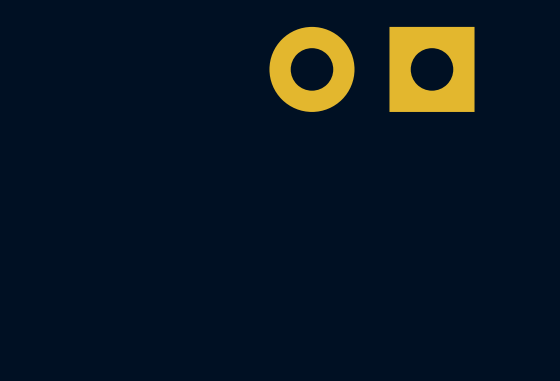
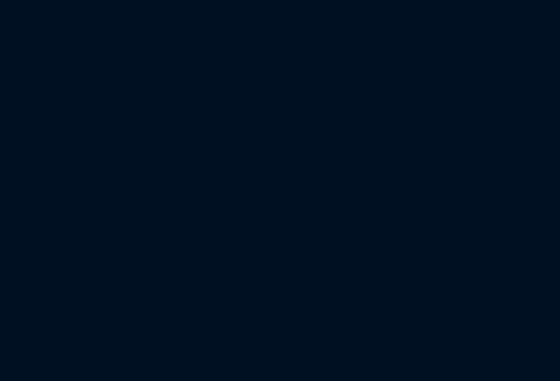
part: (371, 69) -> none

